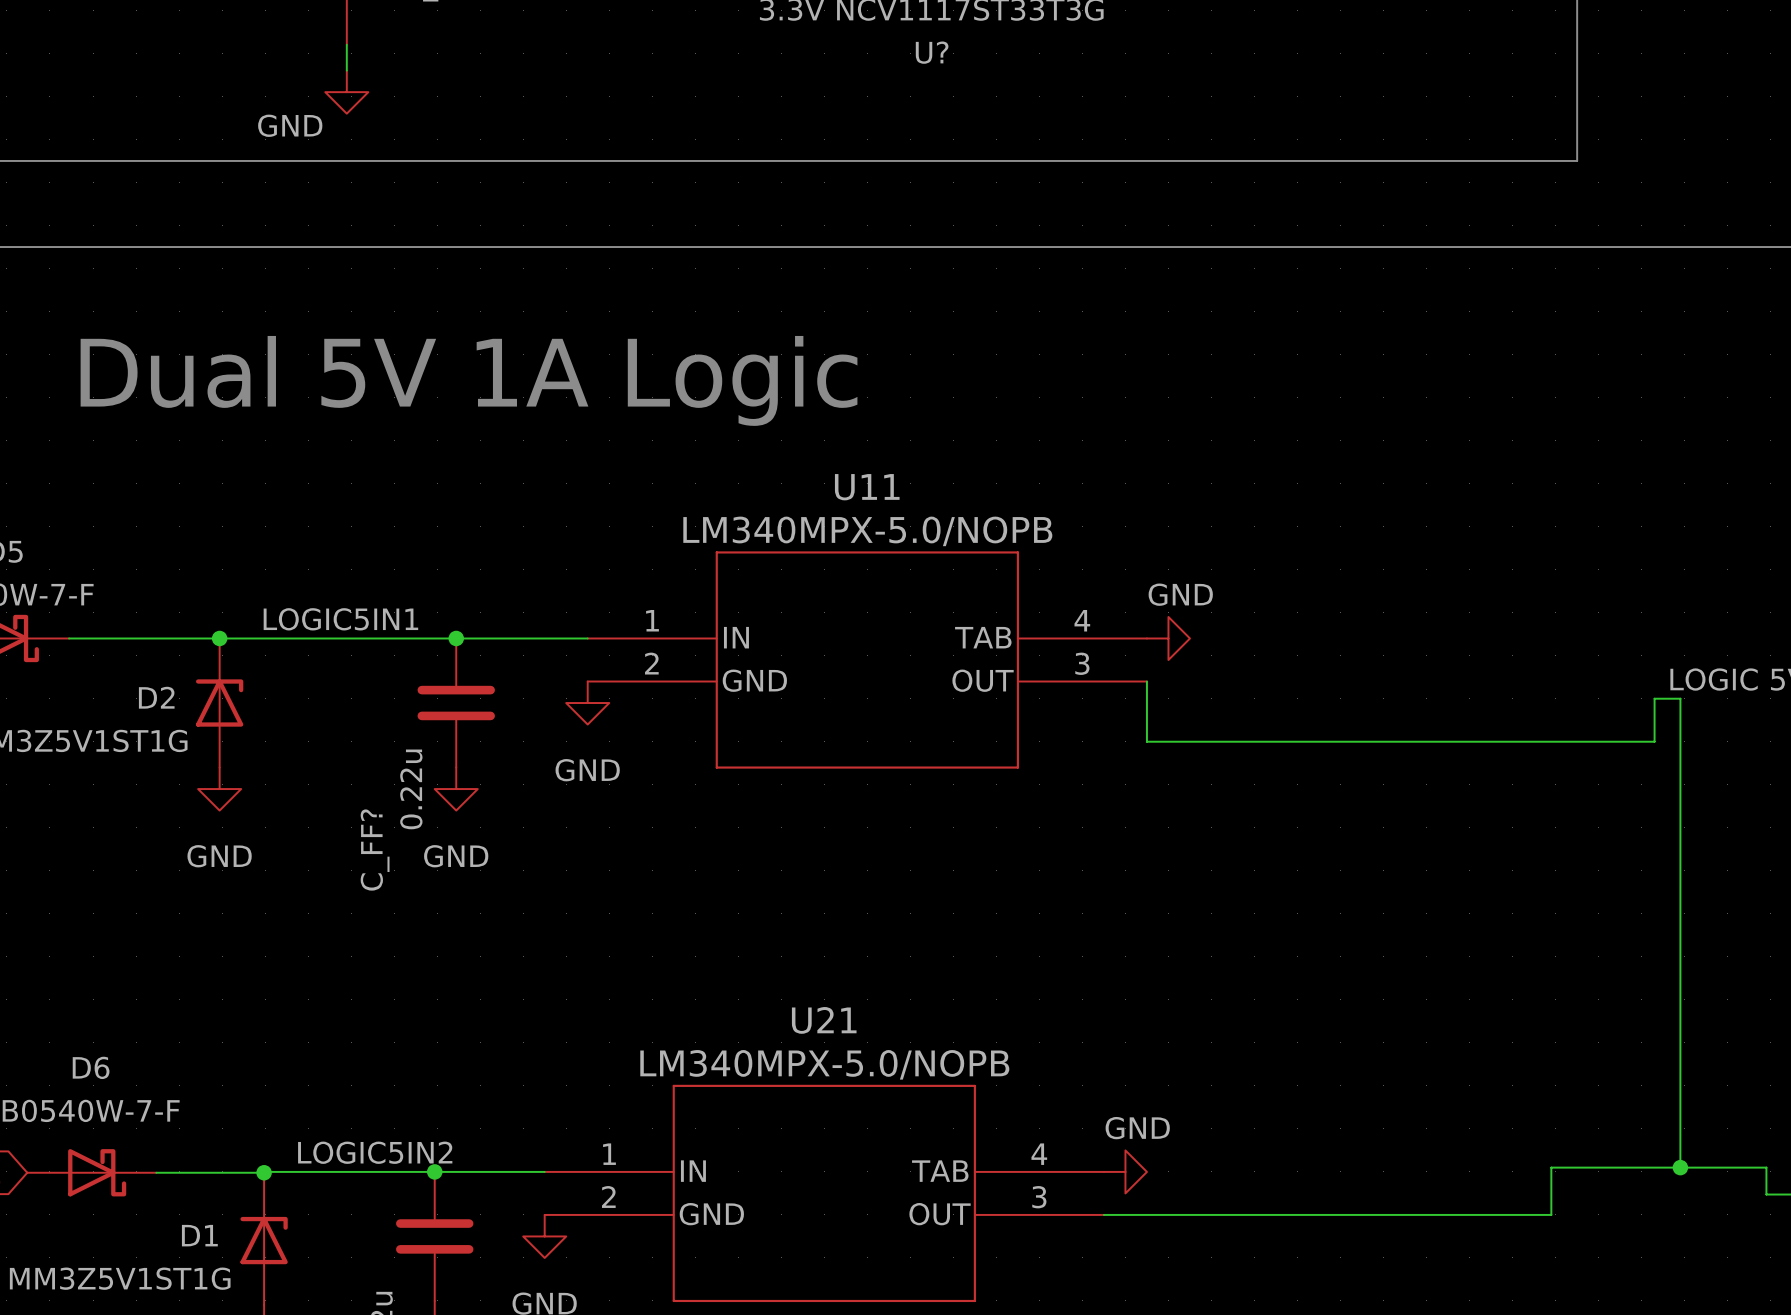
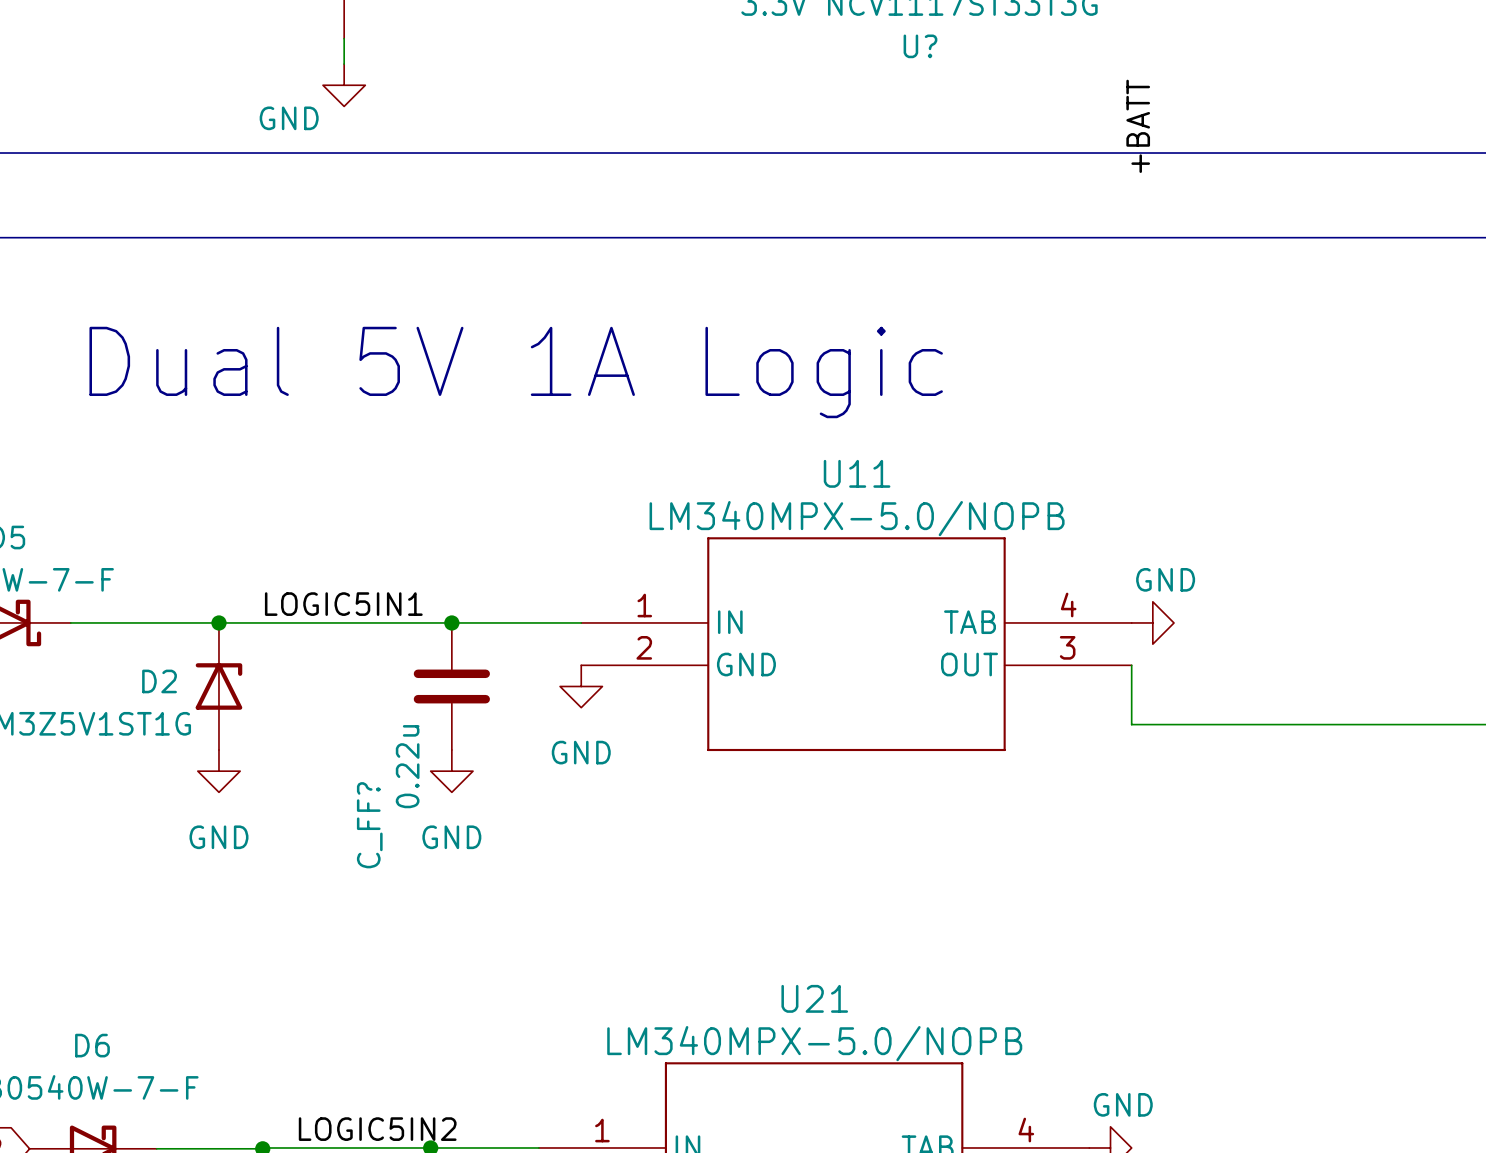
label: none -> +BATT (1138, 126)

